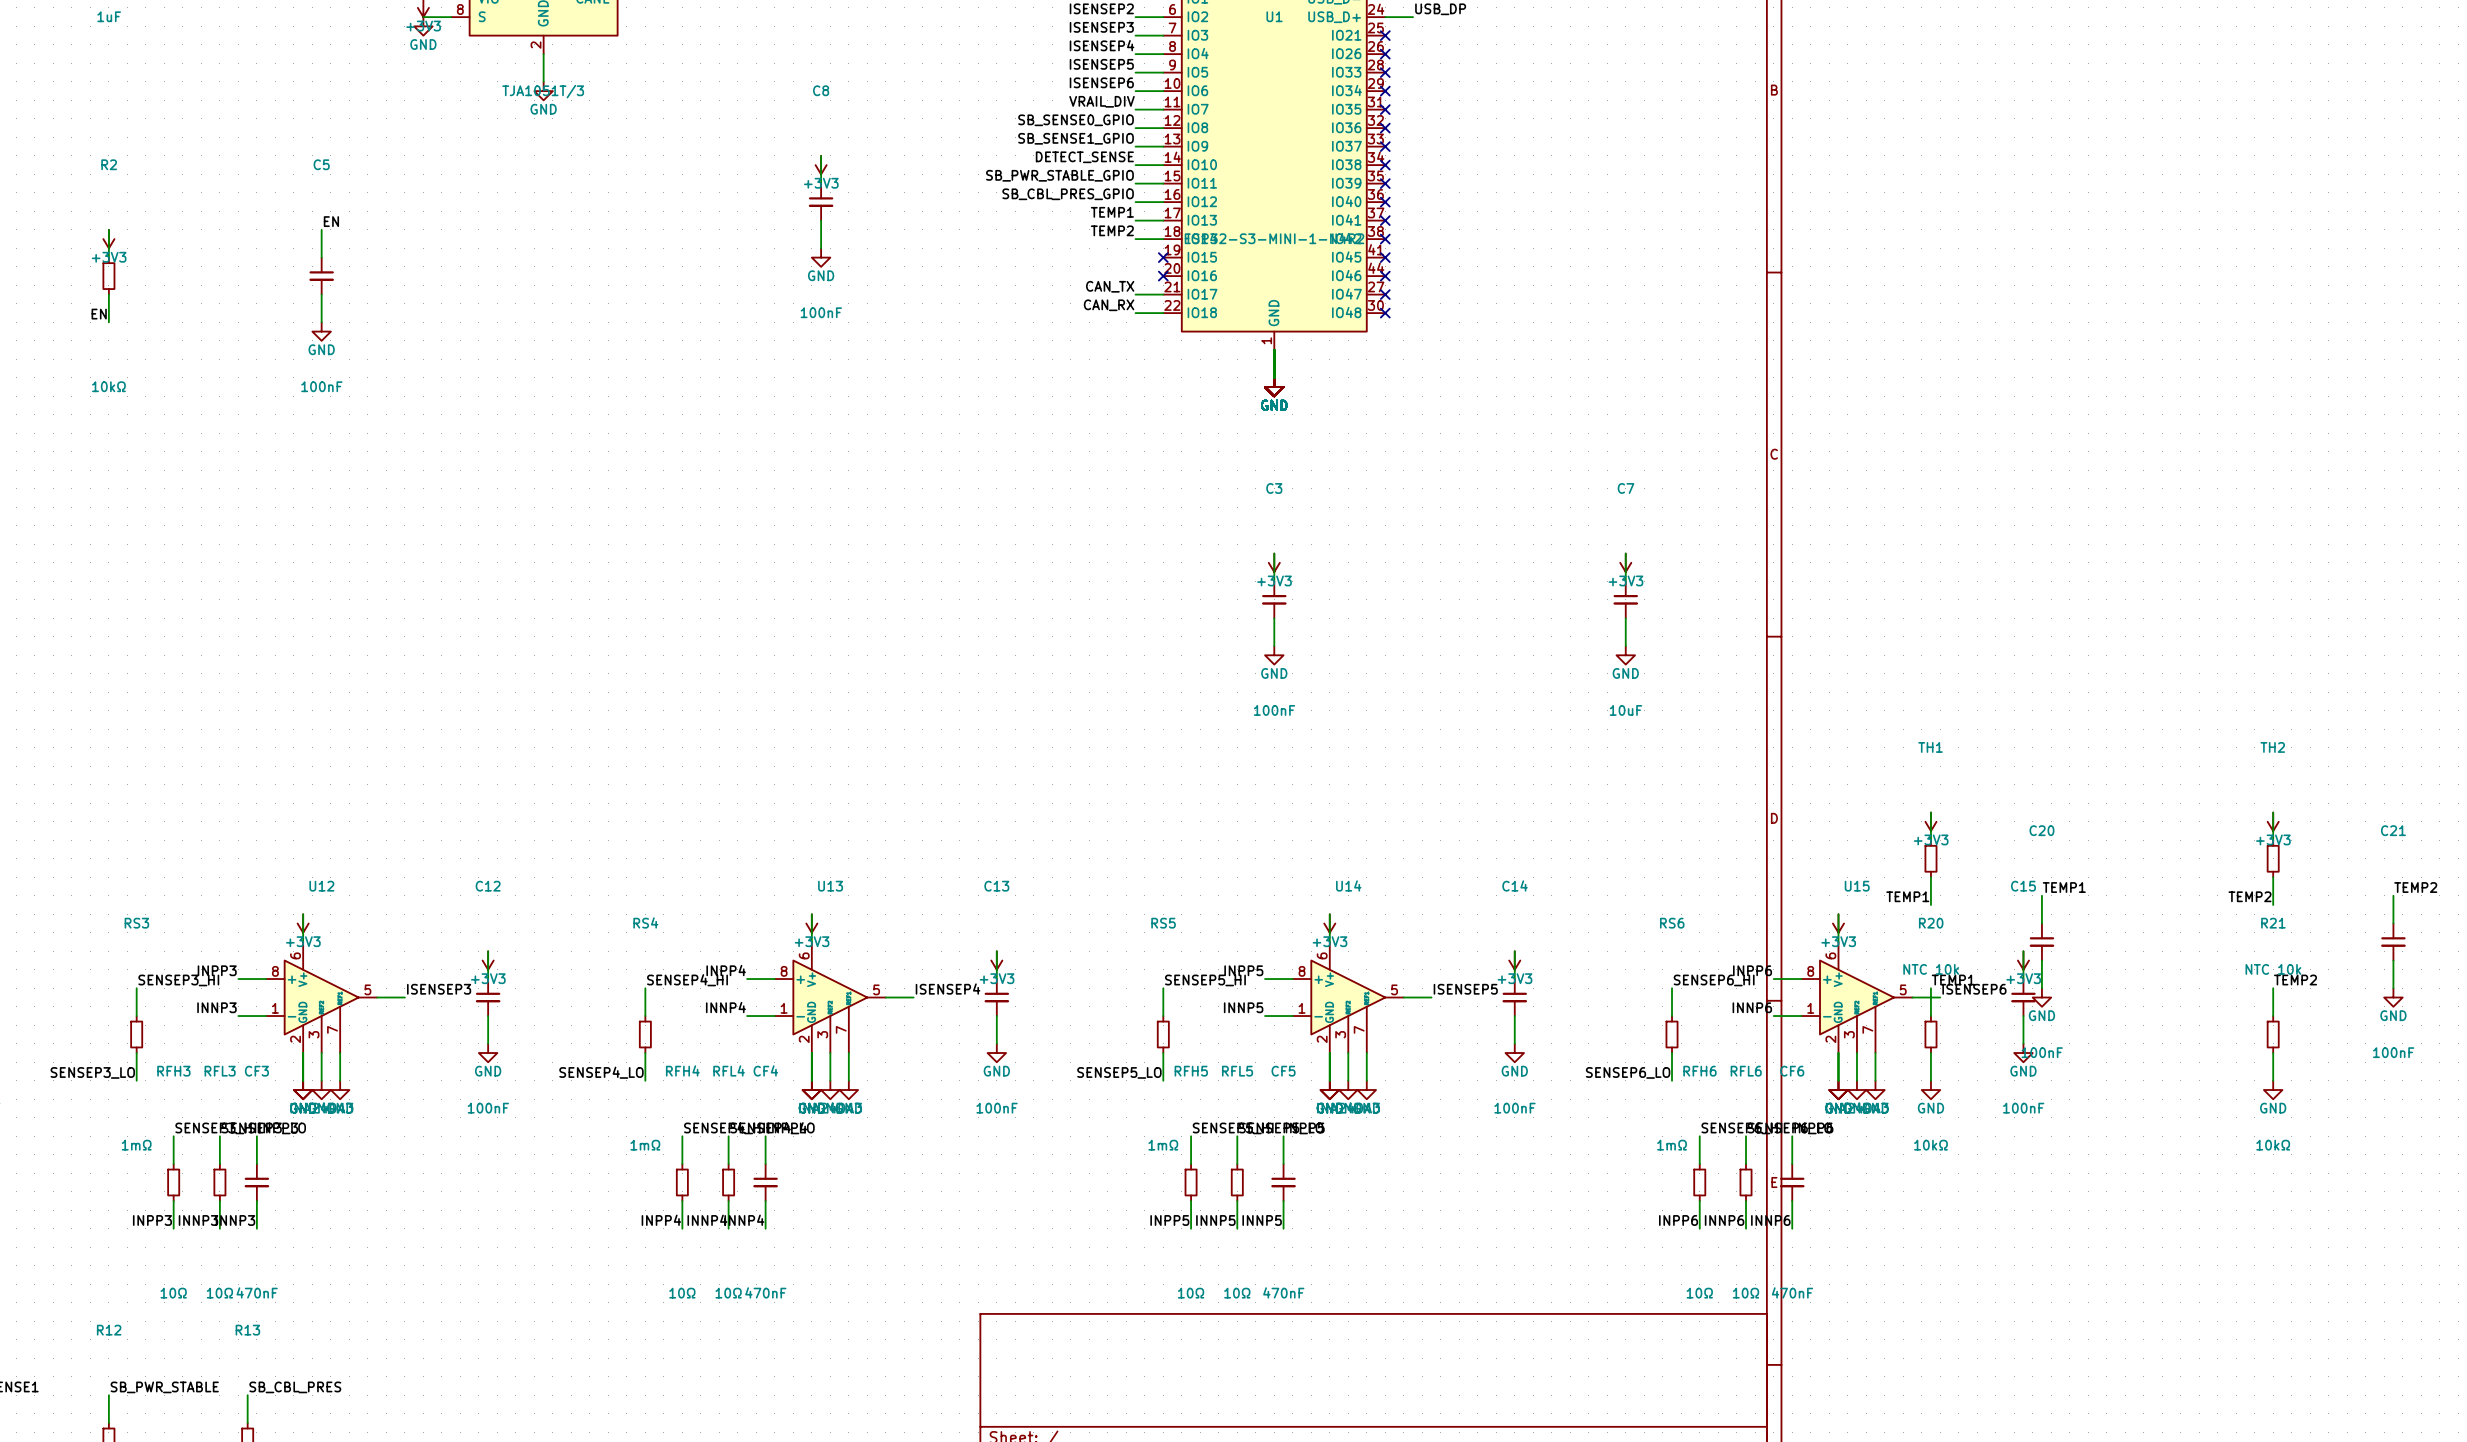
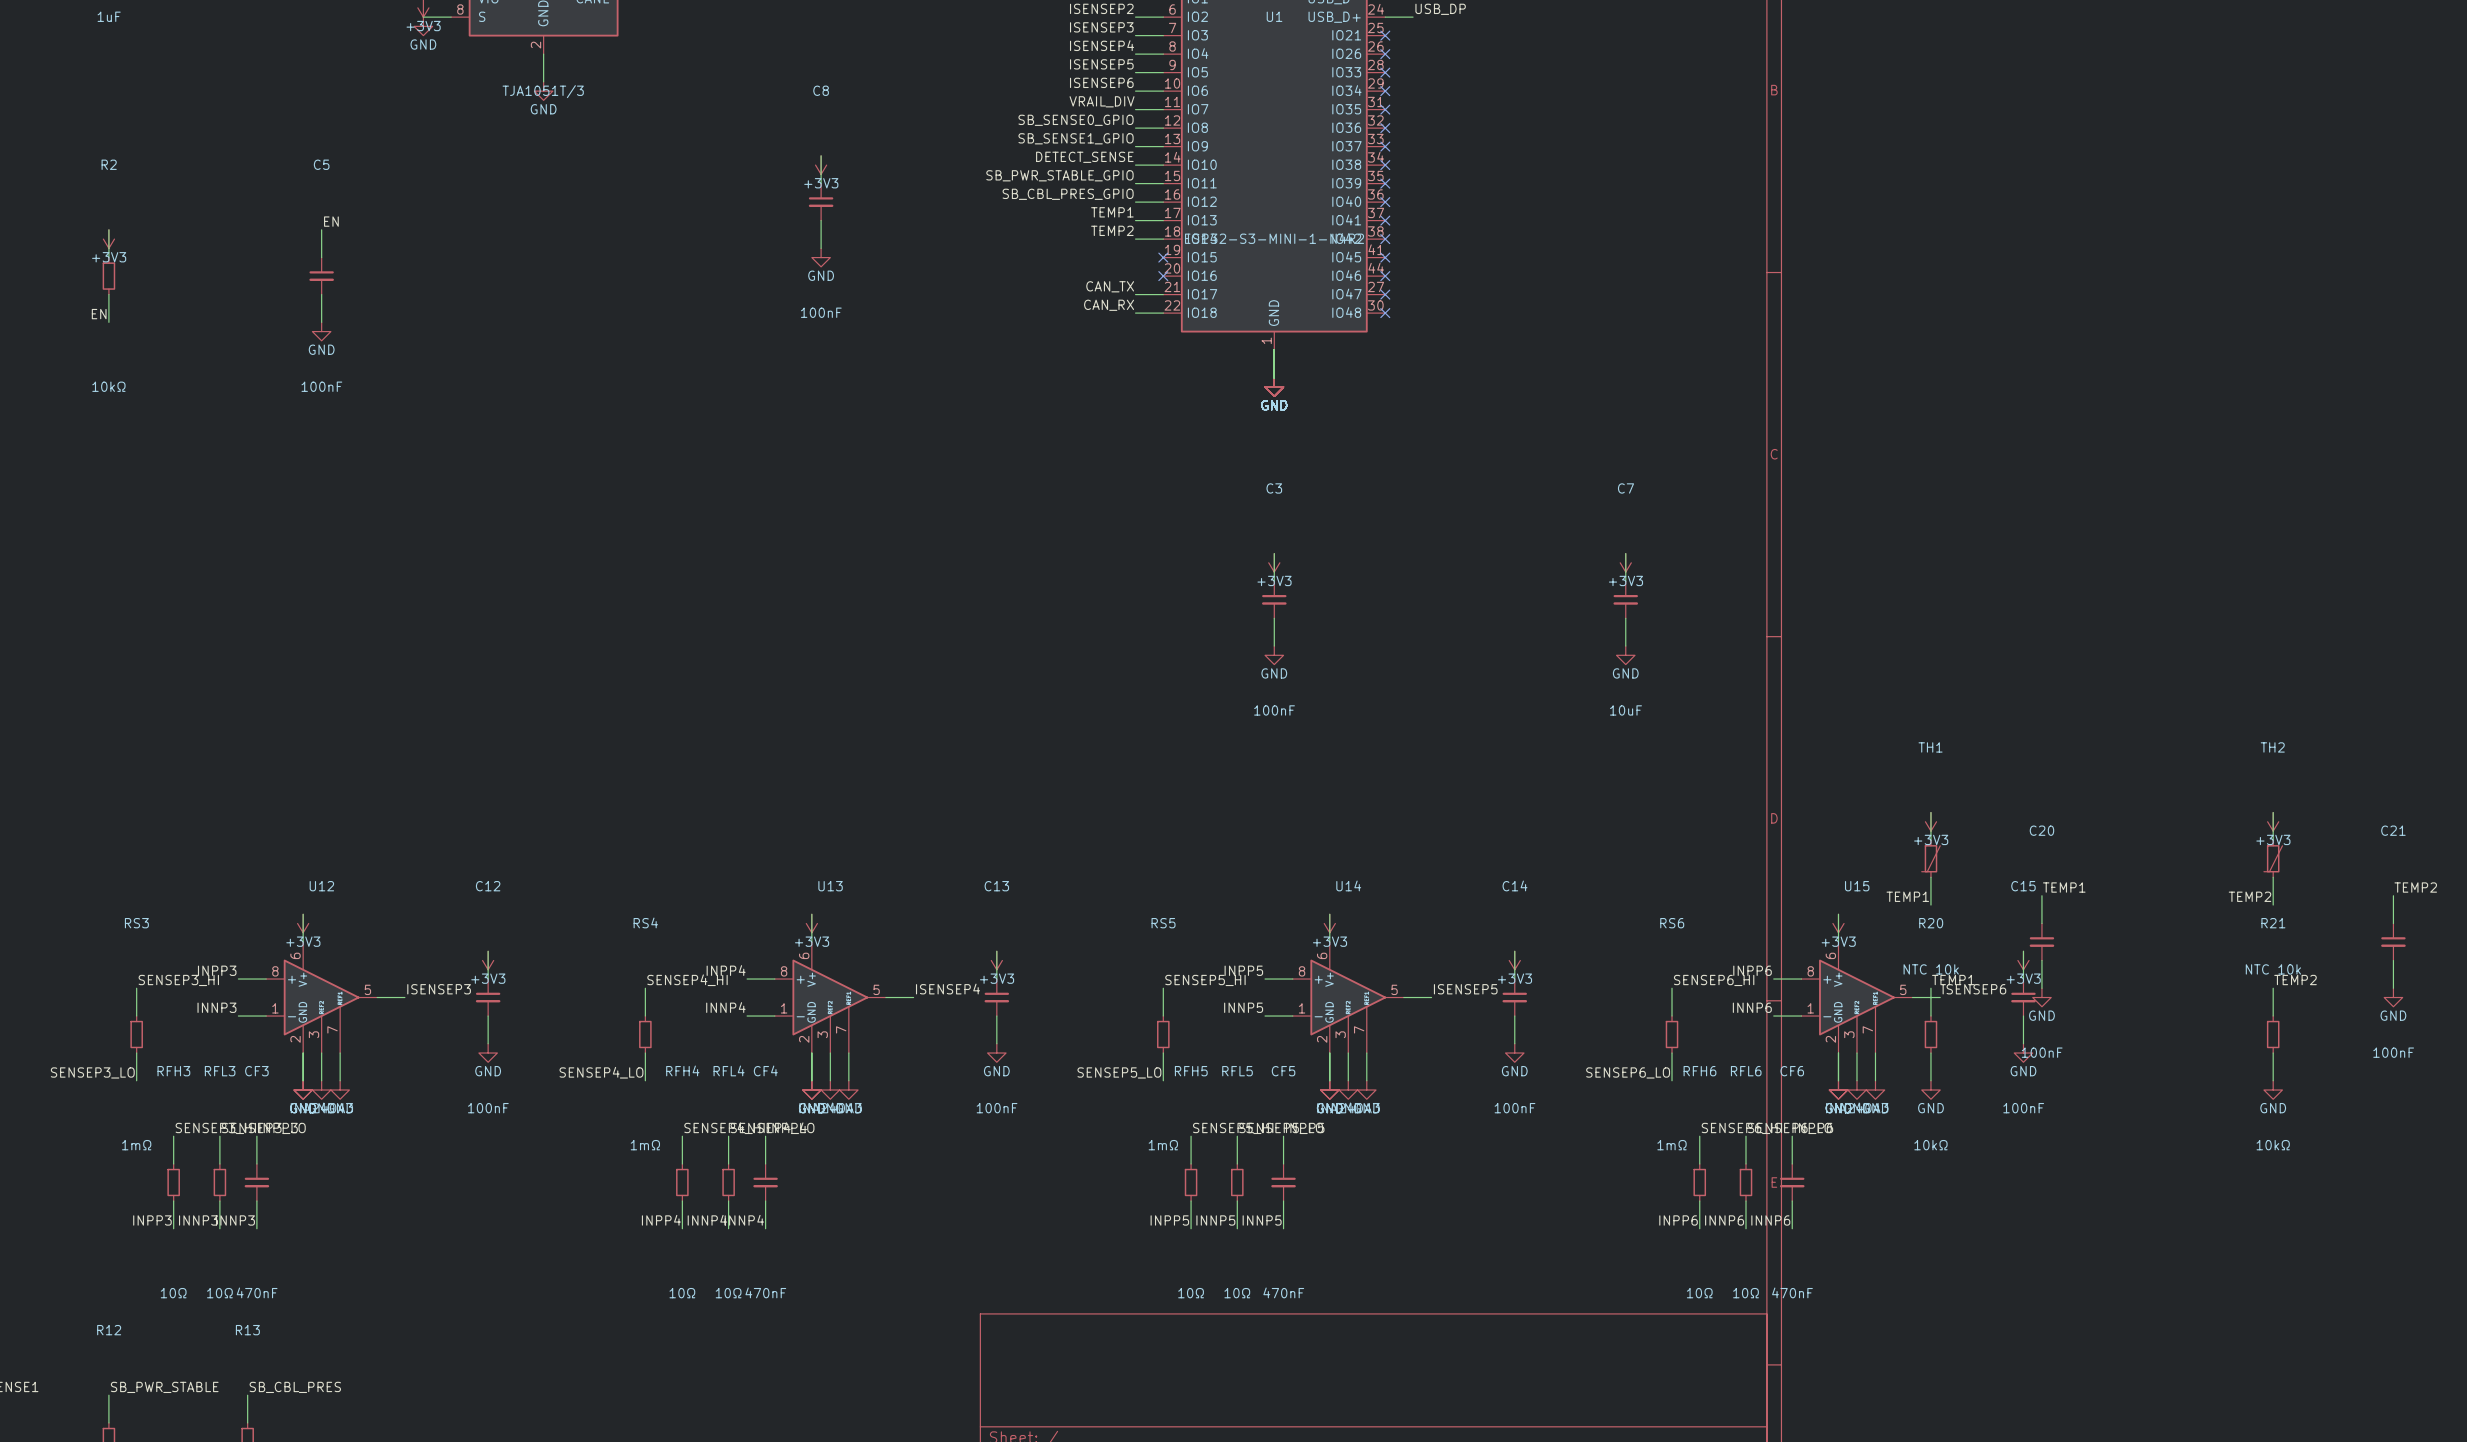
TH1 symbol: [1924, 840, 1938, 878] -> [1921, 840, 1941, 878]
TH2 symbol: [2266, 840, 2280, 878] -> [2263, 840, 2283, 878]

